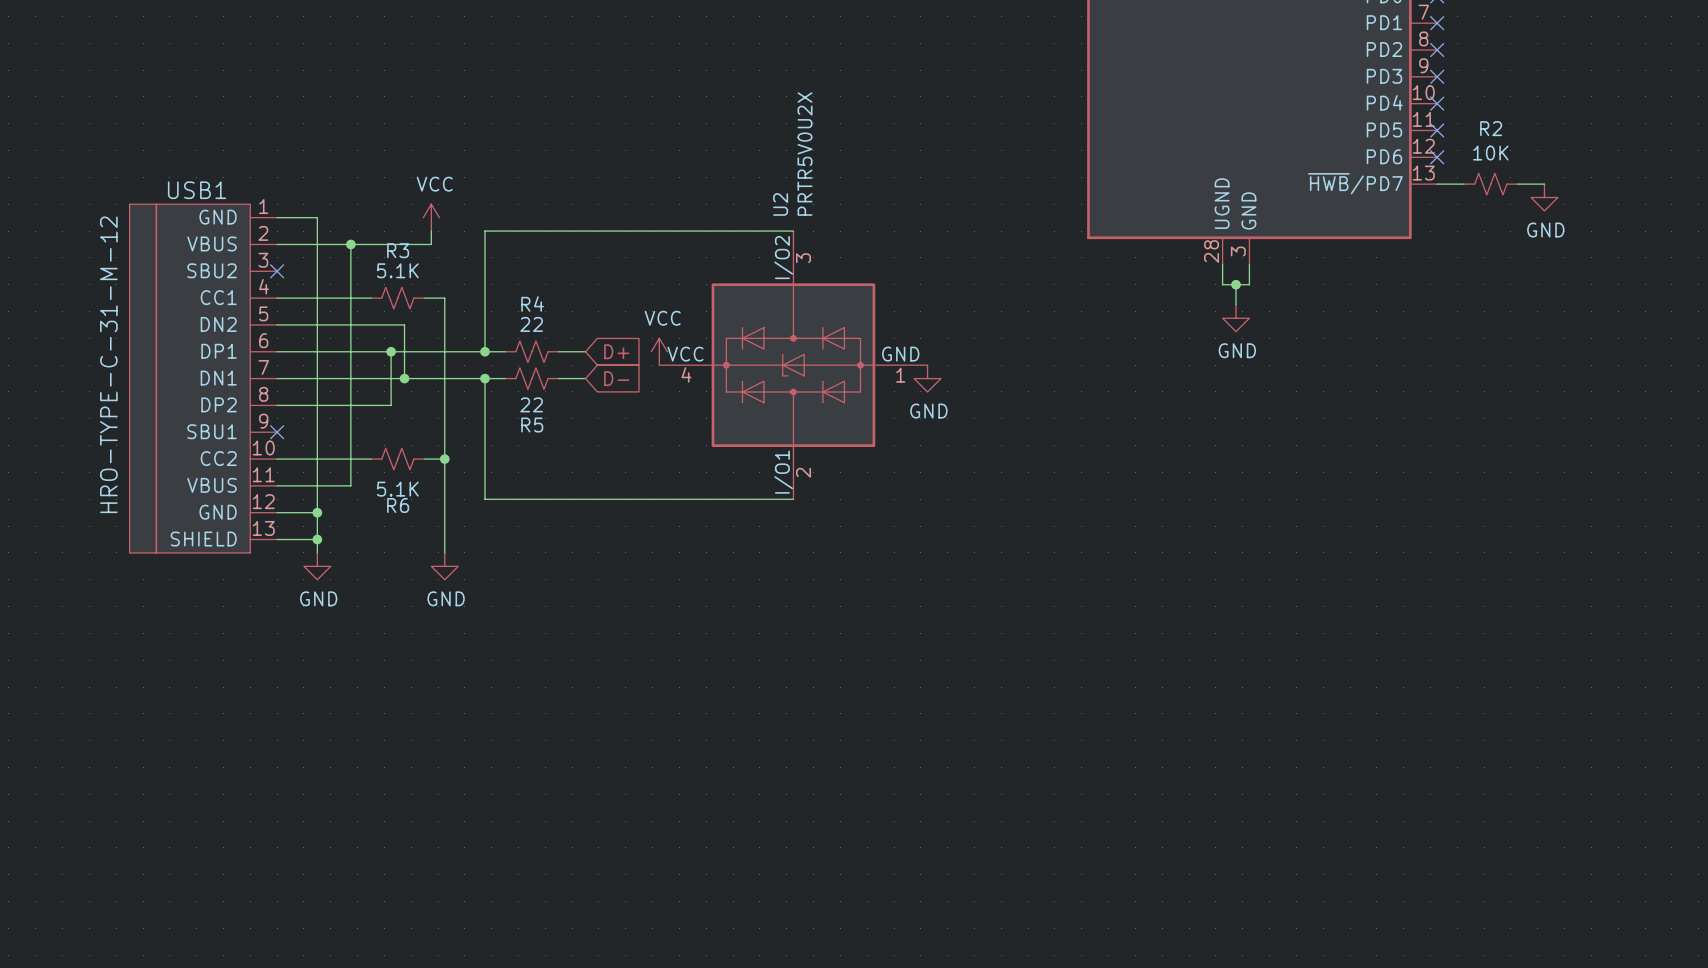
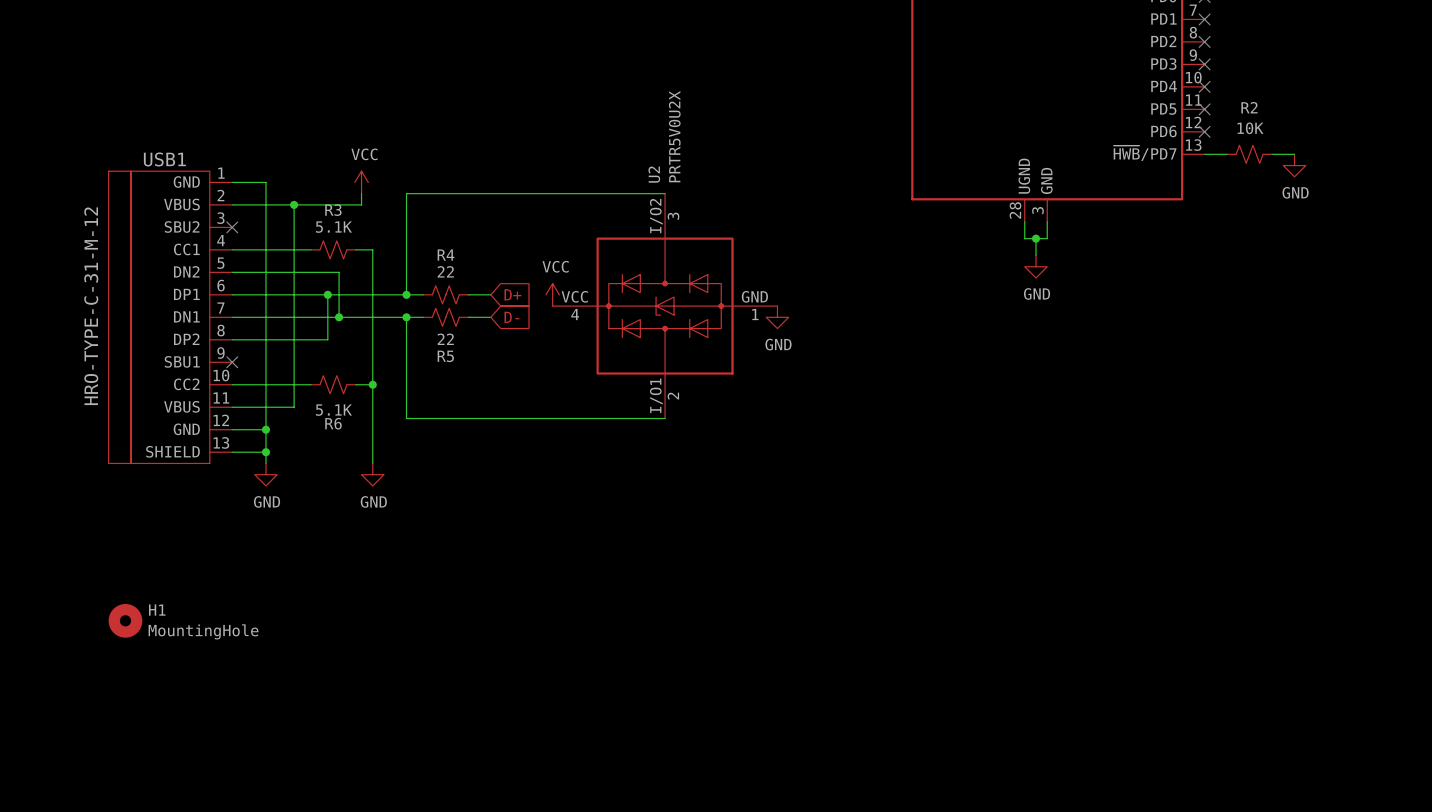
H1: none -> MountingHole (125, 620)

